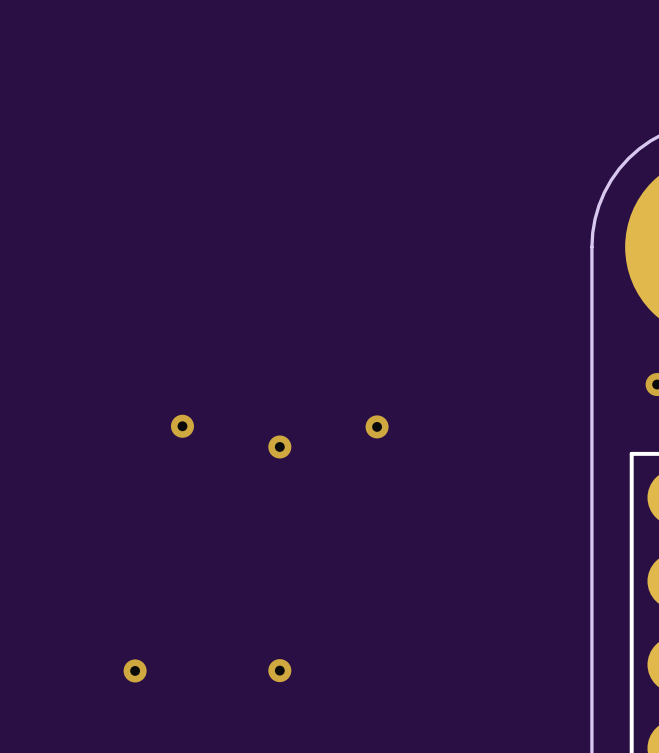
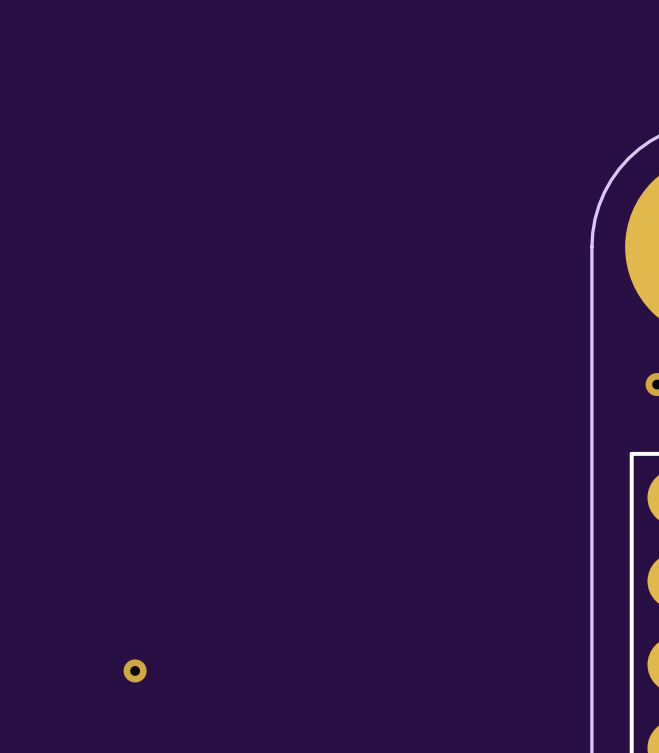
via: (182, 426) -> none
via: (377, 426) -> none
via: (279, 446) -> none
via: (279, 670) -> none

